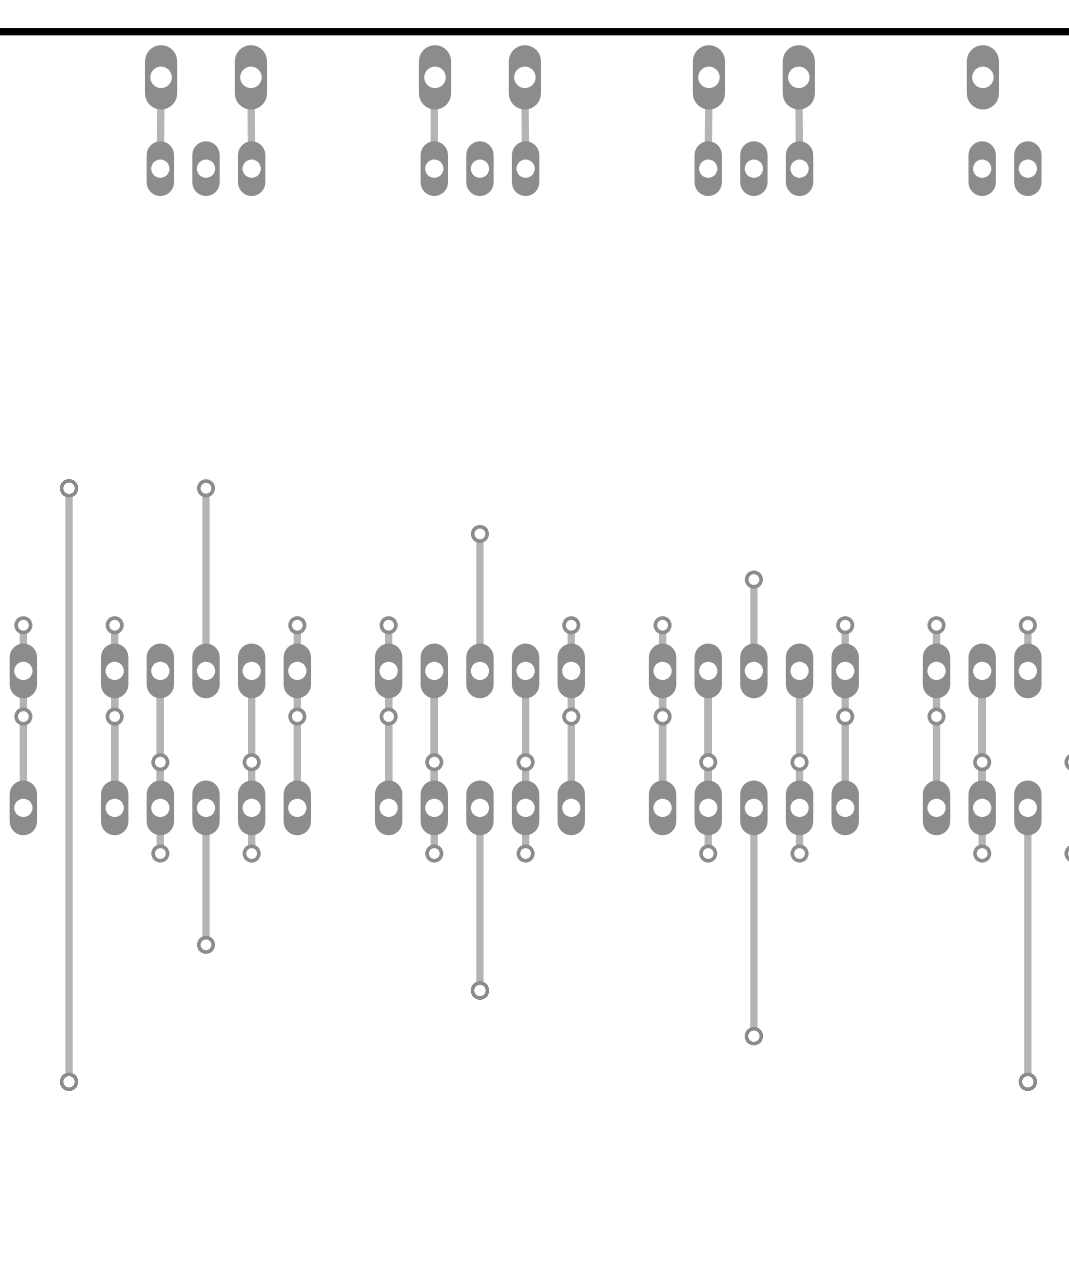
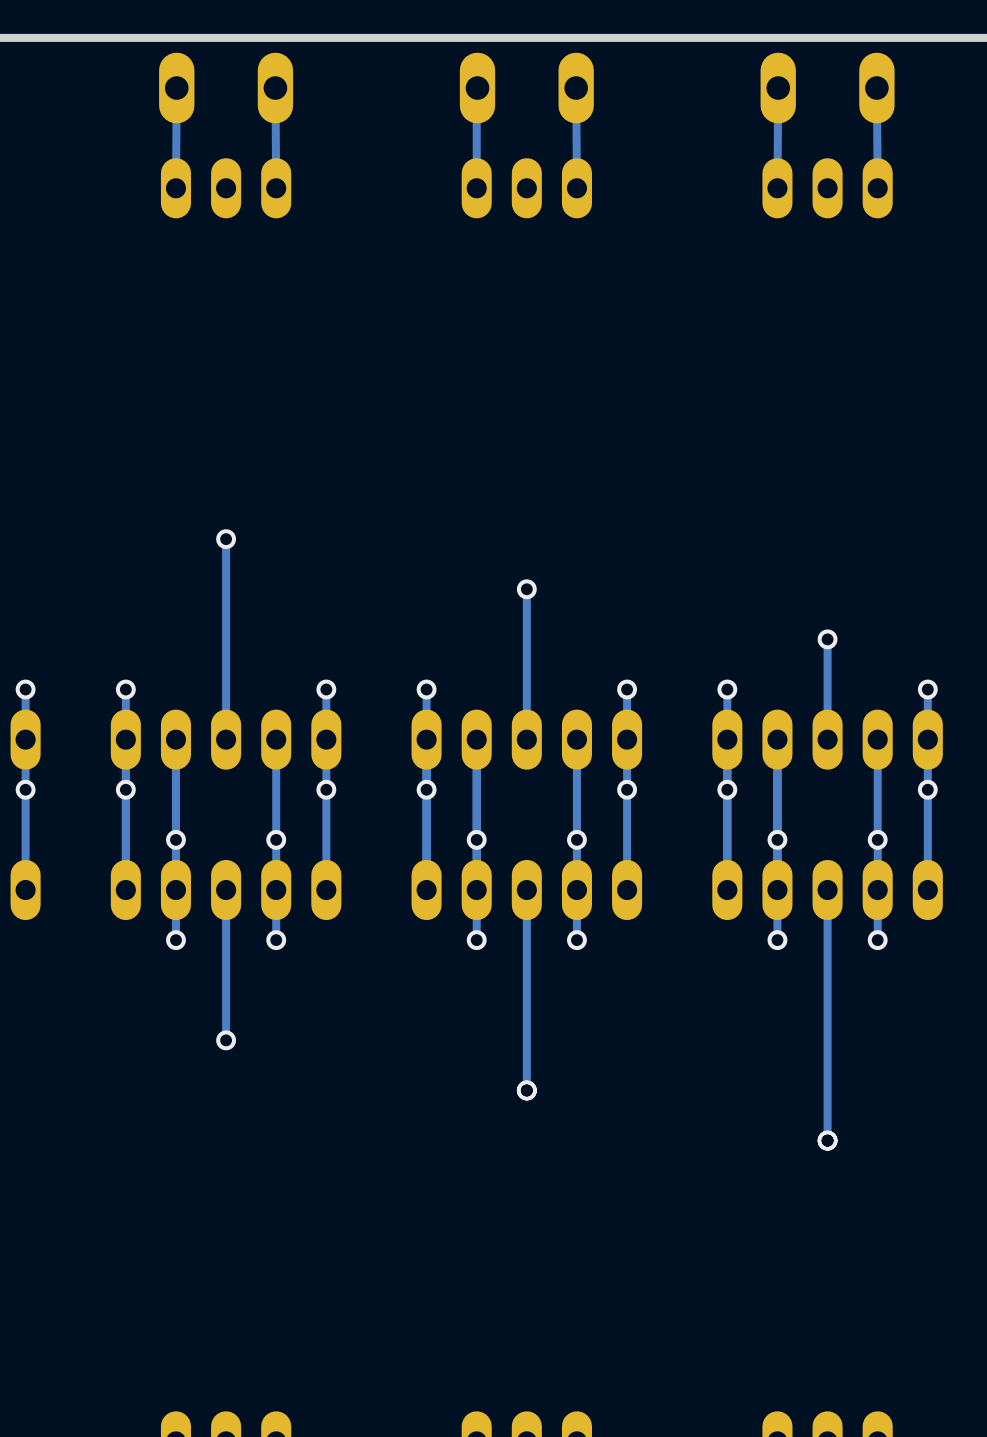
track: (69, 488) (69, 1081) -> none
via: (69, 488) -> none
via: (69, 1081) -> none

